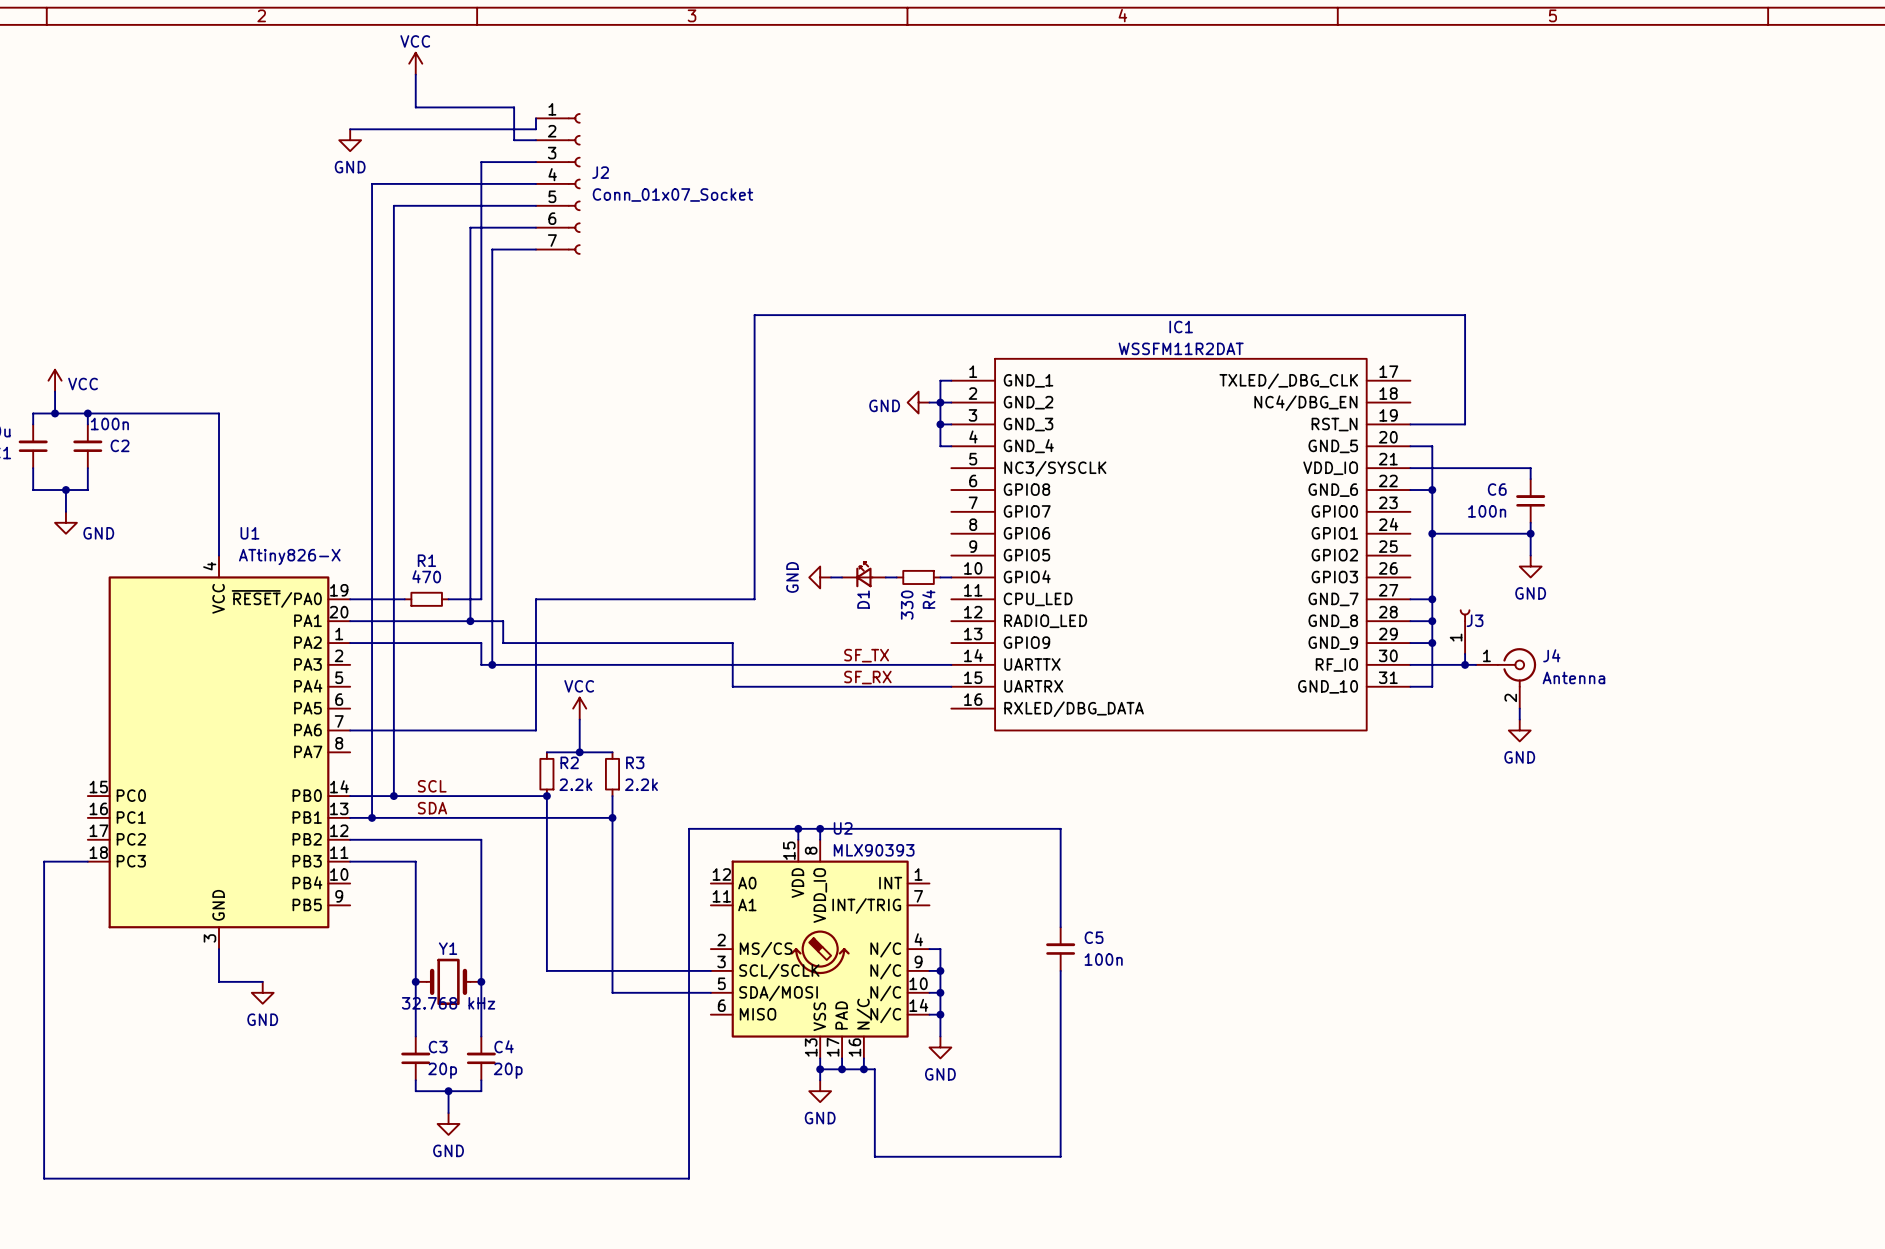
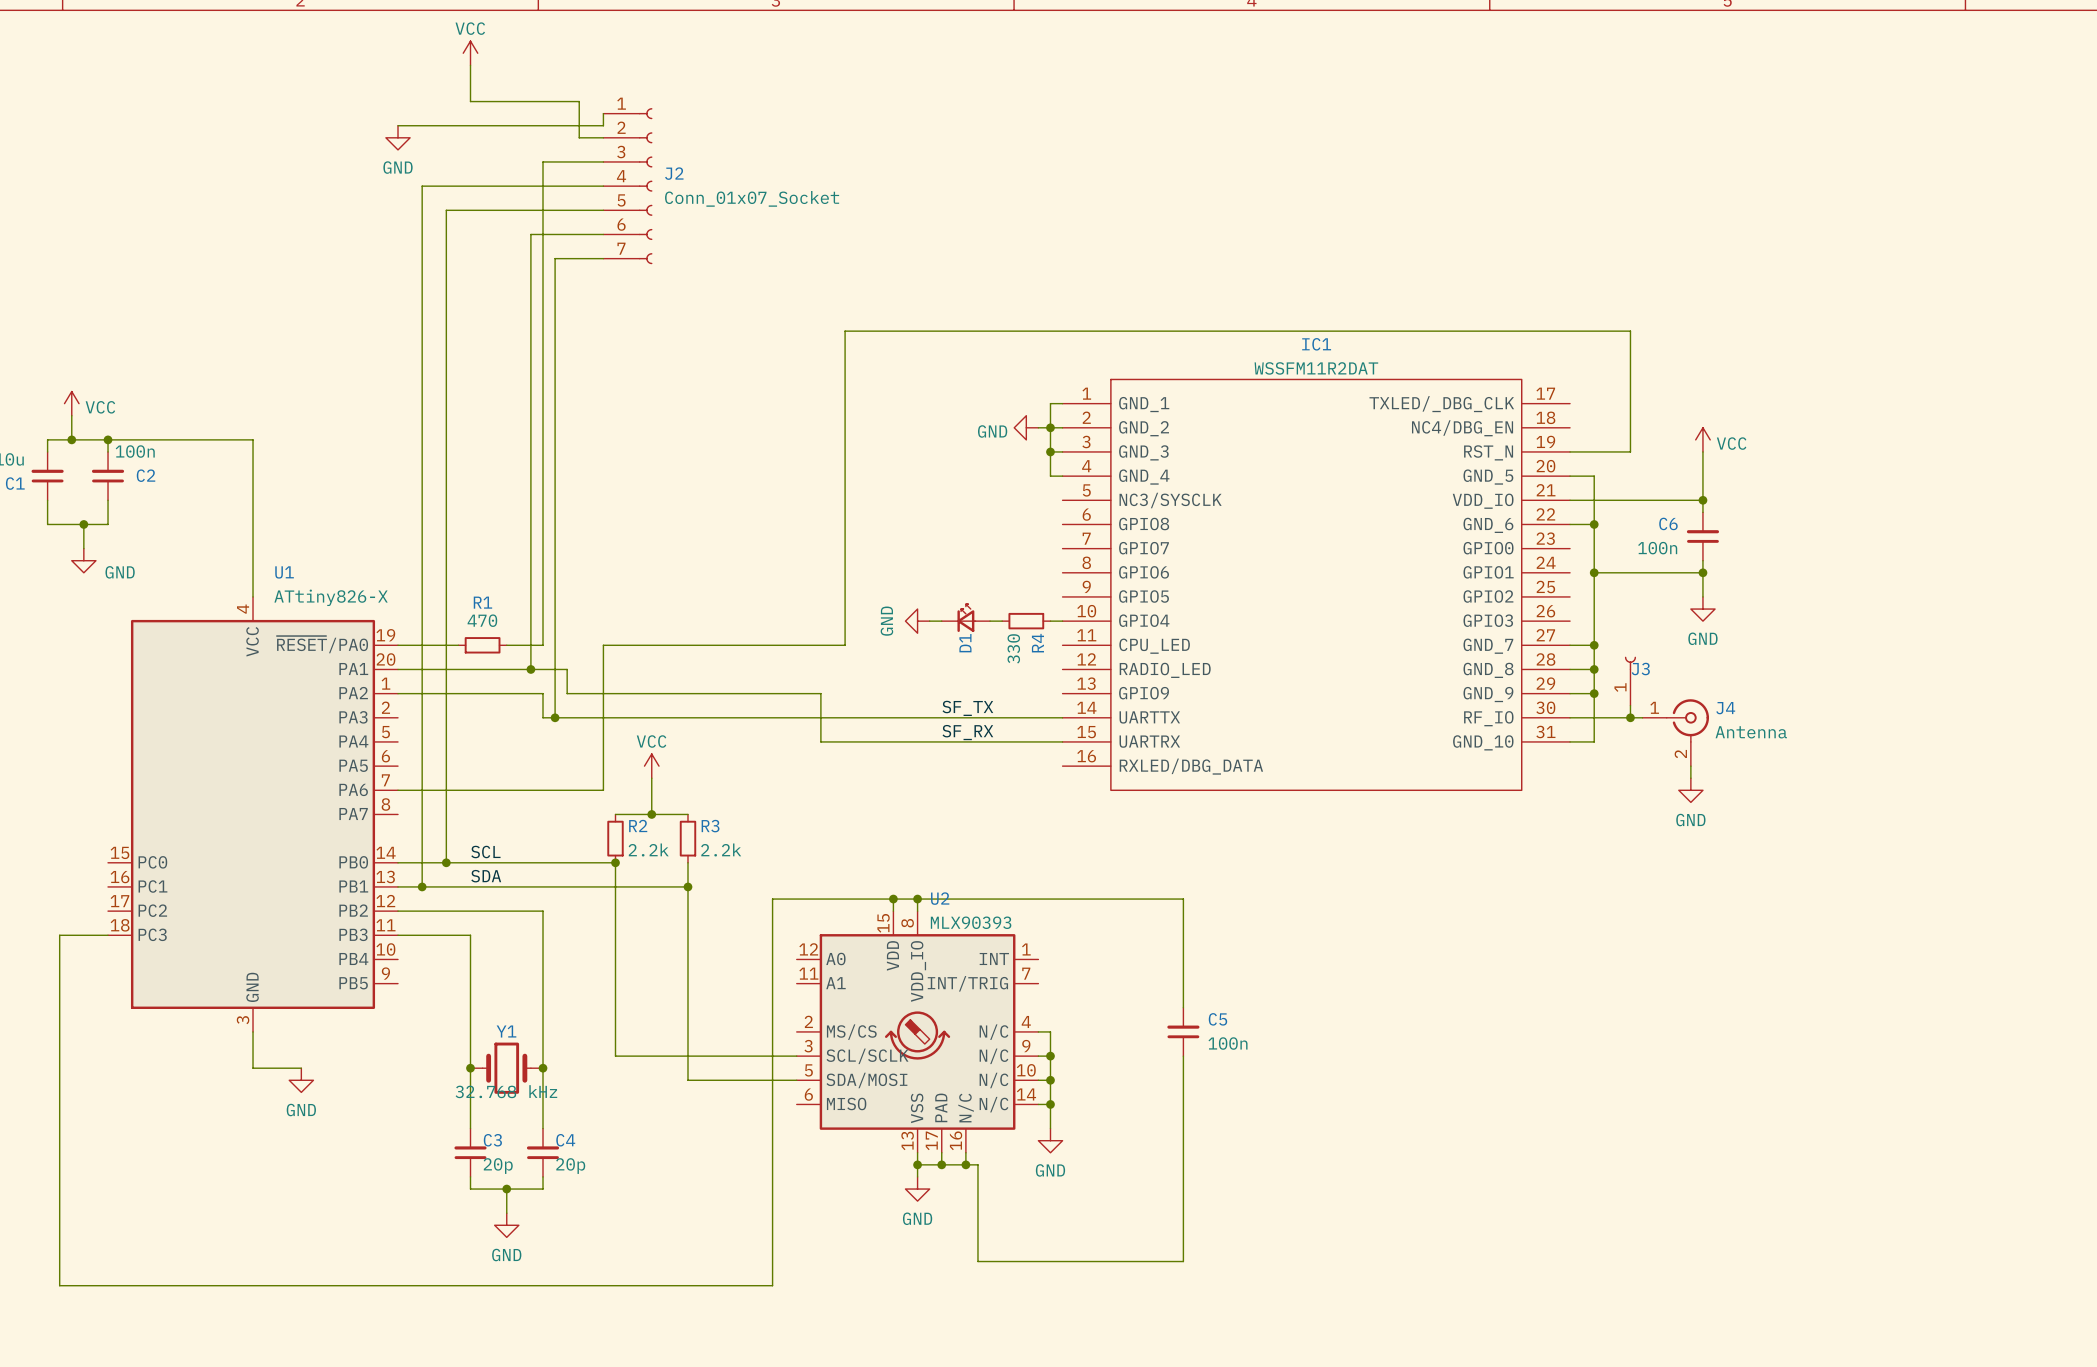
power symbol: none -> VCC (1702, 439)
wire: none -> (1702, 451) (1702, 500)
junction: none -> (1702, 500)

